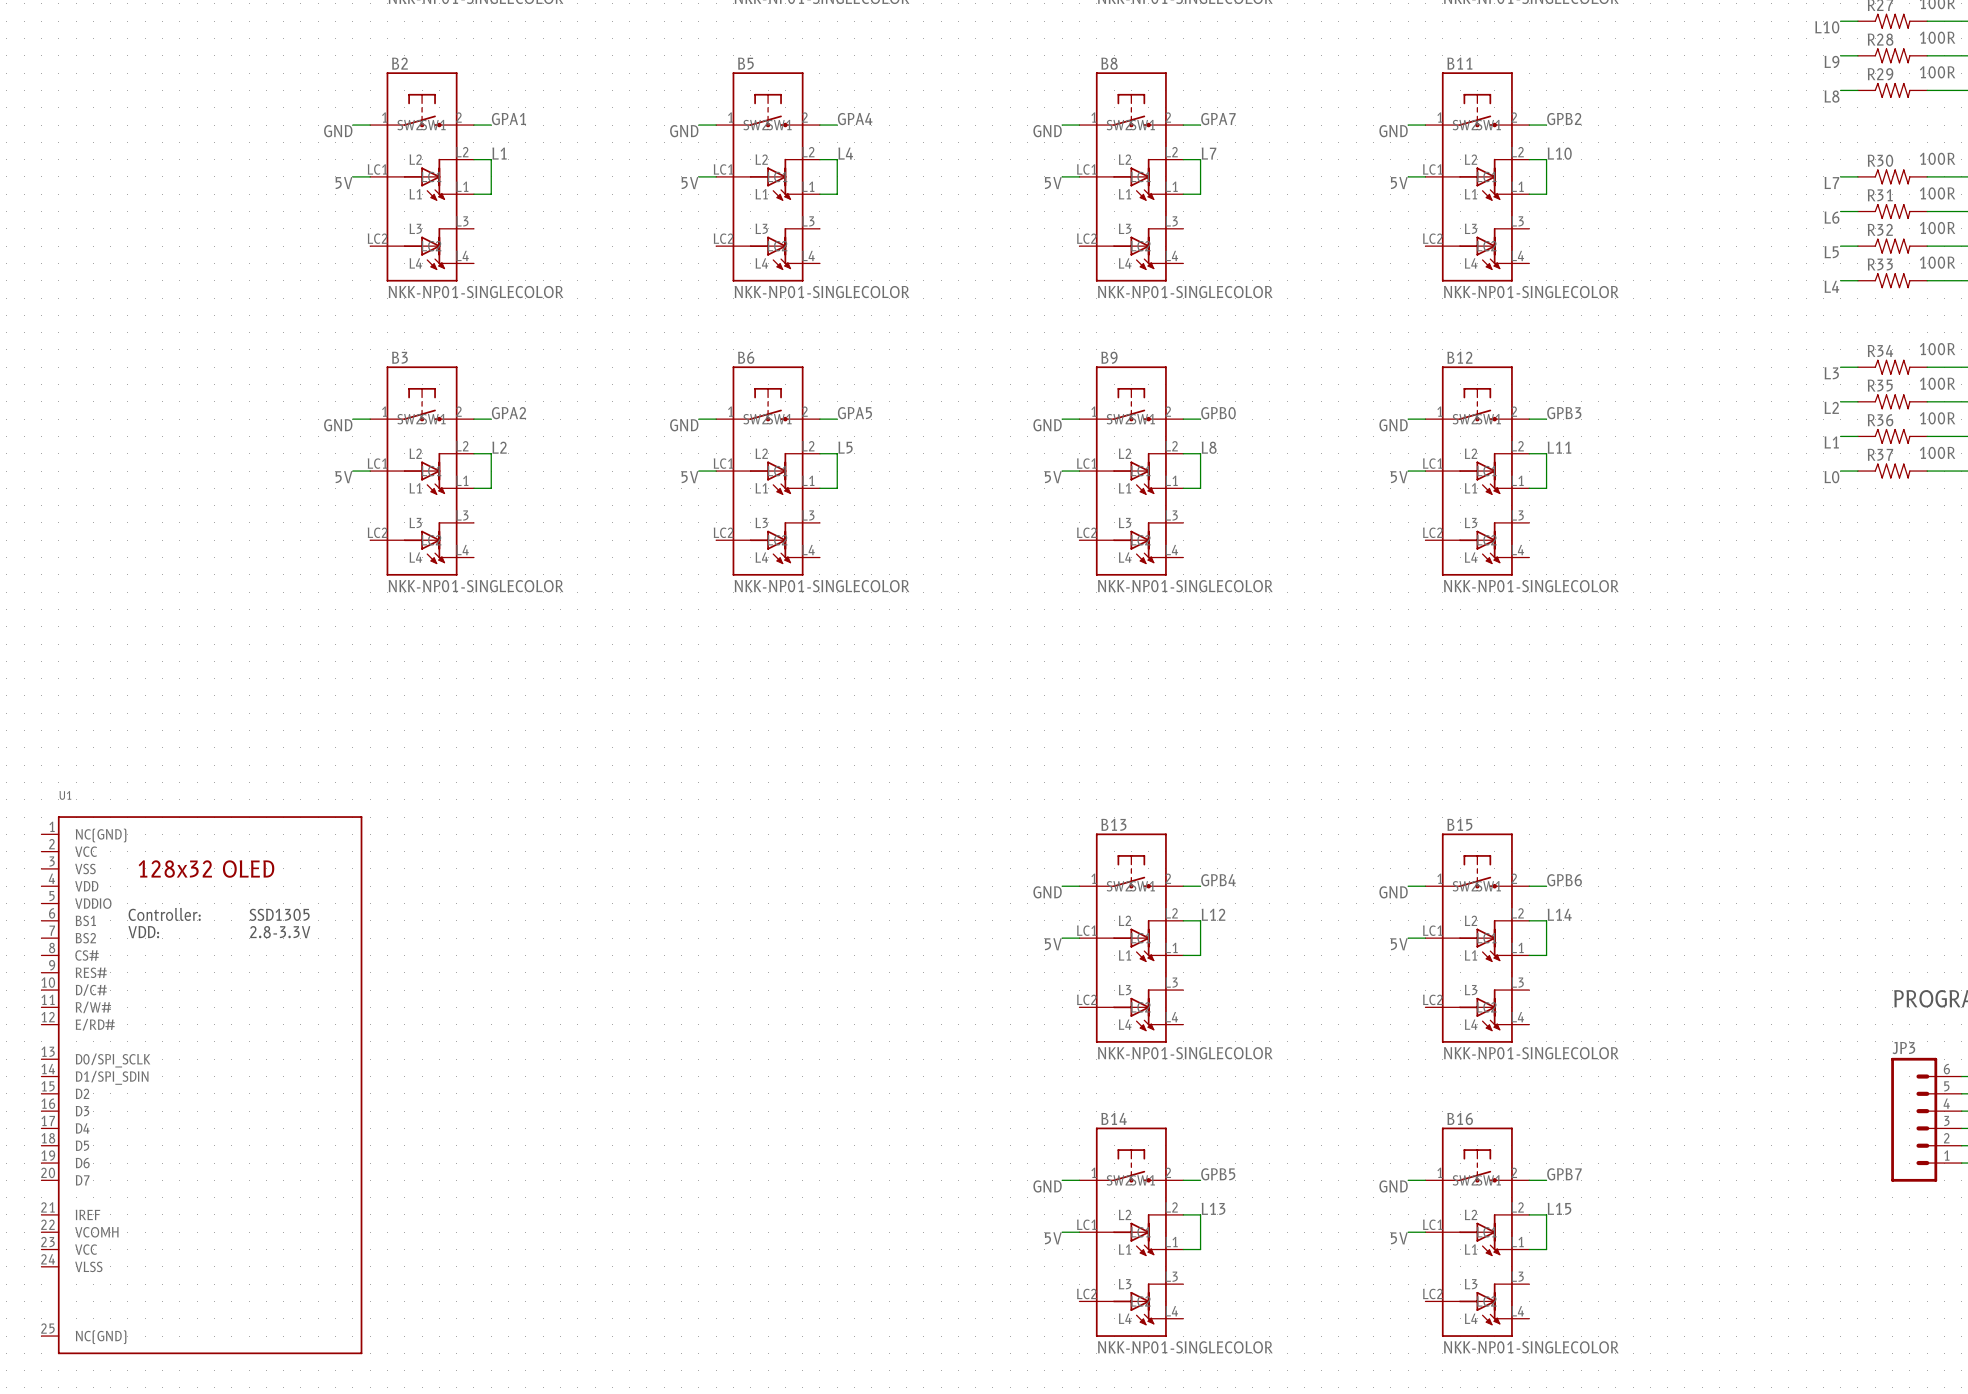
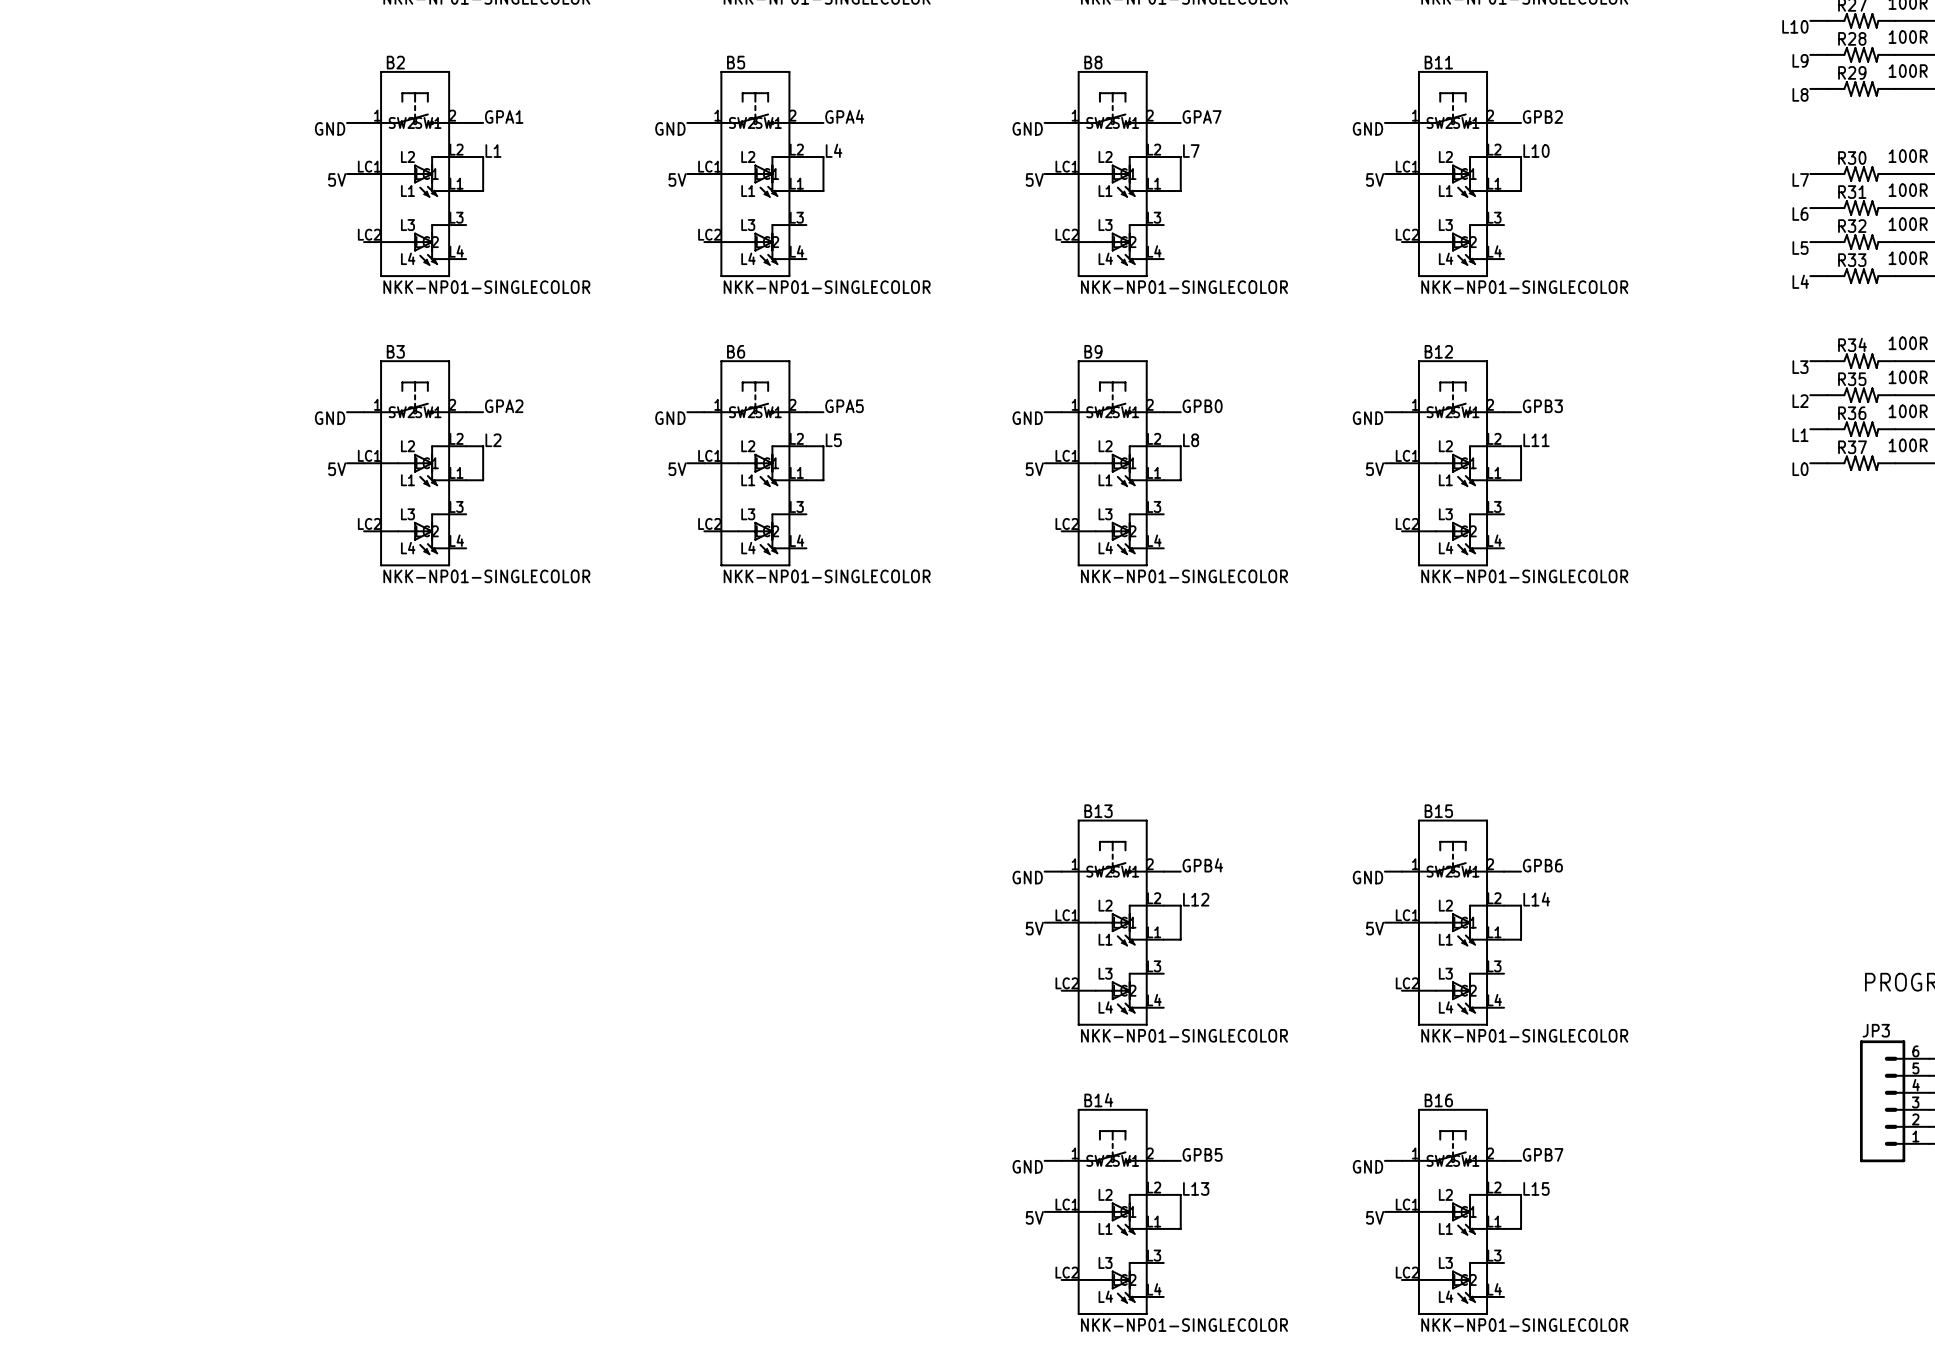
U1: (201, 1085) -> none

